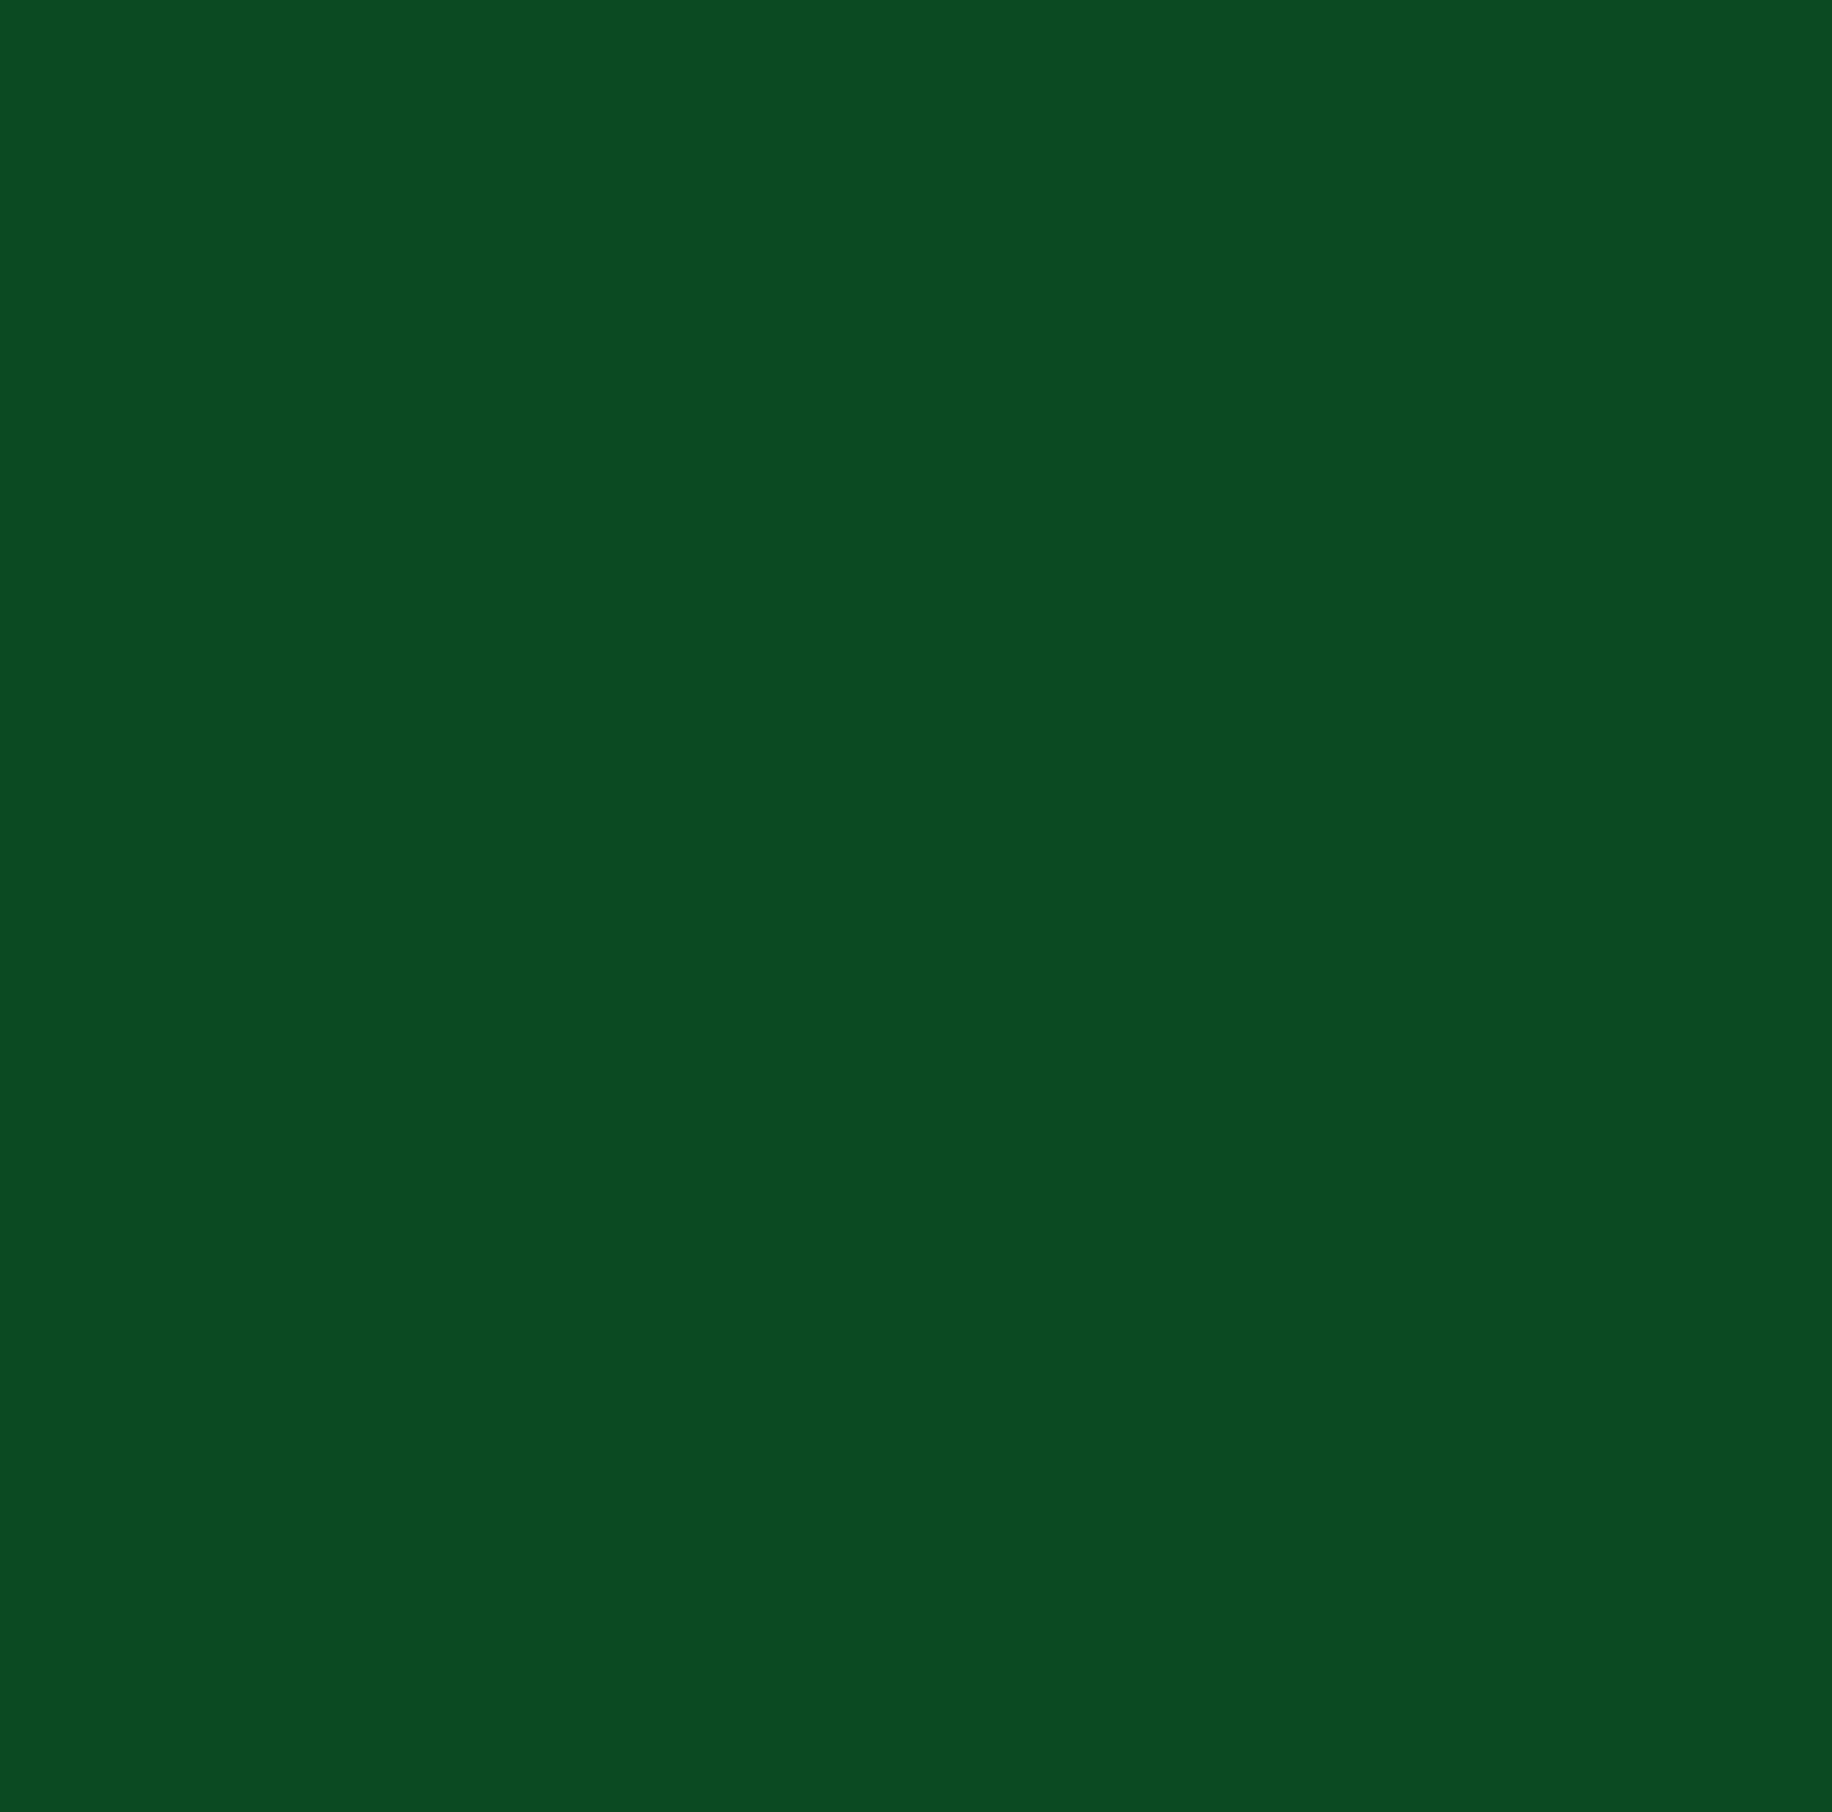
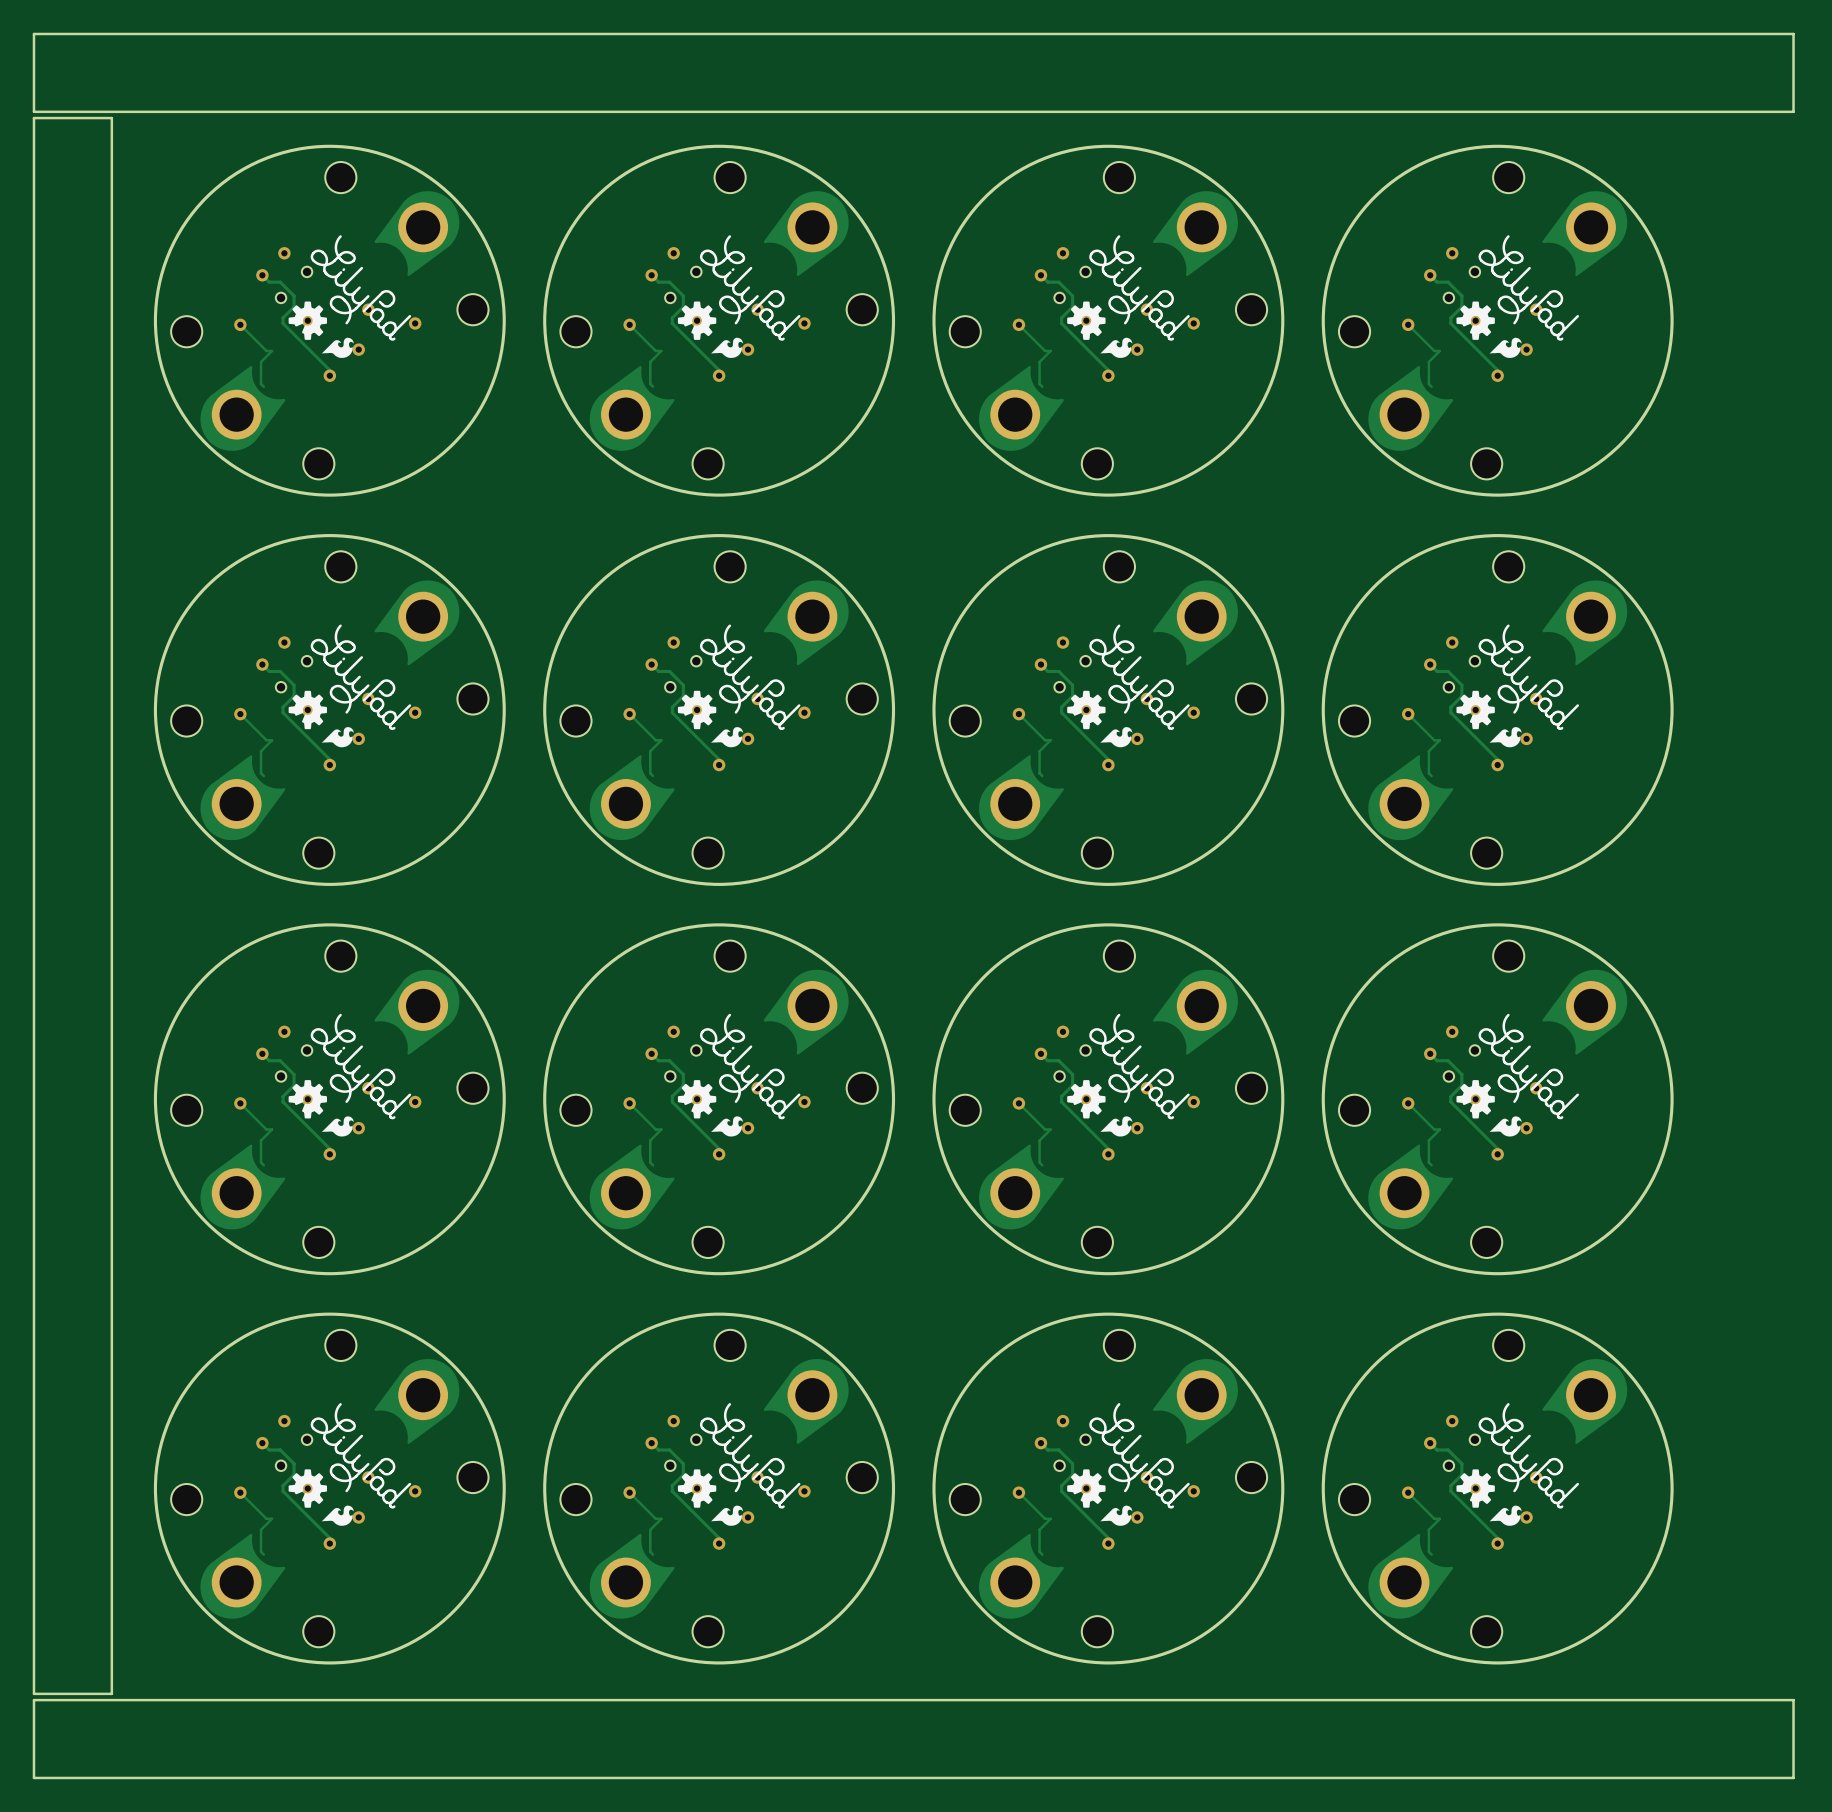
board edge: none -> (1793, 33) (1793, 111) (33, 111) (33, 33) (1793, 33)
board edge: none -> (111, 118) (33, 118) (33, 1693) (111, 1693) (111, 118)
round board edge: none -> [153, 144, 506, 497]
round board edge: none -> [543, 144, 896, 497]
round board edge: none -> [932, 144, 1285, 497]
round board edge: none -> [1321, 144, 1674, 497]
part: none -> (340, 177)
part: none -> (730, 177)
part: none -> (1119, 177)
part: none -> (1508, 177)
part: none -> (416, 233)
part: none -> (806, 233)
part: none -> (1195, 233)
part: none -> (1584, 233)
drawing: none -> [288, 235, 412, 358]
drawing: none -> [677, 235, 801, 358]
drawing: none -> [1067, 235, 1190, 358]
drawing: none -> [1456, 235, 1580, 358]
via: none -> (284, 253)
via: none -> (673, 253)
via: none -> (1062, 253)
via: none -> (1452, 253)
track: none -> (262, 275) (269, 282) (280, 282) (294, 295) (294, 306) (283, 317) (283, 323) (329, 370) (329, 375)
via: none -> (262, 275)
track: none -> (651, 275) (658, 282) (669, 282) (683, 295) (683, 306) (672, 317) (672, 323) (719, 370) (719, 375)
via: none -> (651, 275)
track: none -> (1040, 275) (1047, 282) (1058, 282) (1072, 295) (1072, 306) (1061, 317) (1061, 323) (1108, 370) (1108, 375)
via: none -> (1040, 275)
track: none -> (1430, 275) (1437, 282) (1448, 282) (1461, 295) (1461, 306) (1450, 317) (1450, 323) (1497, 370) (1497, 375)
via: none -> (1430, 275)
part: none -> (294, 284)
part: none -> (683, 284)
part: none -> (1072, 284)
part: none -> (1461, 284)
via: none -> (368, 309)
part: none -> (472, 309)
via: none -> (757, 309)
part: none -> (862, 309)
via: none -> (1146, 309)
part: none -> (1251, 309)
via: none -> (1536, 309)
via: none -> (307, 320)
via: none -> (697, 320)
via: none -> (1086, 320)
via: none -> (1475, 320)
via: none -> (415, 323)
via: none -> (804, 323)
via: none -> (1193, 323)
track: none -> (240, 324) (266, 350) (272, 350) (261, 362) (261, 384) (263, 386)
via: none -> (240, 324)
track: none -> (629, 324) (655, 350) (661, 350) (650, 362) (650, 384) (653, 386)
via: none -> (629, 324)
track: none -> (1018, 324) (1045, 350) (1050, 350) (1039, 362) (1039, 384) (1042, 386)
via: none -> (1018, 324)
track: none -> (1408, 324) (1434, 350) (1439, 350) (1428, 362) (1428, 384) (1431, 386)
via: none -> (1408, 324)
part: none -> (186, 331)
part: none -> (575, 331)
part: none -> (965, 331)
part: none -> (1354, 331)
via: none -> (358, 349)
via: none -> (748, 349)
via: none -> (1137, 349)
via: none -> (1526, 349)
via: none -> (329, 375)
via: none -> (719, 375)
via: none -> (1108, 375)
via: none -> (1497, 375)
part: none -> (242, 408)
part: none -> (632, 408)
part: none -> (1021, 408)
part: none -> (1410, 408)
part: none -> (318, 463)
part: none -> (708, 463)
part: none -> (1097, 463)
part: none -> (1486, 463)
round board edge: none -> [153, 534, 506, 886]
round board edge: none -> [543, 534, 896, 886]
round board edge: none -> [932, 534, 1285, 886]
round board edge: none -> [1321, 534, 1674, 886]
part: none -> (340, 566)
part: none -> (730, 566)
part: none -> (1119, 566)
part: none -> (1508, 566)
part: none -> (416, 622)
part: none -> (806, 622)
part: none -> (1195, 622)
part: none -> (1584, 622)
drawing: none -> [288, 624, 412, 748]
drawing: none -> [677, 624, 801, 748]
drawing: none -> [1067, 624, 1190, 748]
drawing: none -> [1456, 624, 1580, 748]
via: none -> (284, 642)
via: none -> (673, 642)
via: none -> (1062, 642)
via: none -> (1452, 642)
track: none -> (262, 664) (269, 671) (280, 671) (294, 685) (294, 696) (283, 707) (283, 712) (329, 759) (329, 765)
via: none -> (262, 664)
track: none -> (651, 664) (658, 671) (669, 671) (683, 685) (683, 696) (672, 707) (672, 712) (719, 759) (719, 765)
via: none -> (651, 664)
track: none -> (1040, 664) (1047, 671) (1058, 671) (1072, 685) (1072, 696) (1061, 707) (1061, 712) (1108, 759) (1108, 765)
via: none -> (1040, 664)
track: none -> (1430, 664) (1437, 671) (1448, 671) (1461, 685) (1461, 696) (1450, 707) (1450, 712) (1497, 759) (1497, 765)
via: none -> (1430, 664)
part: none -> (294, 674)
part: none -> (683, 674)
part: none -> (1072, 674)
part: none -> (1461, 674)
via: none -> (368, 698)
part: none -> (472, 698)
via: none -> (757, 698)
part: none -> (862, 698)
via: none -> (1146, 698)
part: none -> (1251, 698)
via: none -> (1536, 698)
via: none -> (307, 709)
via: none -> (697, 709)
via: none -> (1086, 709)
via: none -> (1475, 709)
via: none -> (415, 712)
via: none -> (804, 712)
via: none -> (1193, 712)
track: none -> (240, 714) (266, 740) (272, 740) (261, 751) (261, 773) (263, 776)
via: none -> (240, 714)
track: none -> (629, 714) (655, 740) (661, 740) (650, 751) (650, 773) (653, 776)
via: none -> (629, 714)
track: none -> (1018, 714) (1045, 740) (1050, 740) (1039, 751) (1039, 773) (1042, 776)
via: none -> (1018, 714)
track: none -> (1408, 714) (1434, 740) (1439, 740) (1428, 751) (1428, 773) (1431, 776)
via: none -> (1408, 714)
part: none -> (186, 721)
part: none -> (575, 721)
part: none -> (965, 721)
part: none -> (1354, 721)
via: none -> (358, 738)
via: none -> (748, 738)
via: none -> (1137, 738)
via: none -> (1526, 738)
via: none -> (329, 765)
via: none -> (719, 765)
via: none -> (1108, 765)
via: none -> (1497, 765)
part: none -> (242, 797)
part: none -> (632, 797)
part: none -> (1021, 797)
part: none -> (1410, 797)
part: none -> (318, 853)
part: none -> (708, 853)
part: none -> (1097, 853)
part: none -> (1486, 853)
round board edge: none -> [153, 923, 506, 1276]
round board edge: none -> [543, 923, 896, 1276]
round board edge: none -> [932, 923, 1285, 1276]
round board edge: none -> [1321, 923, 1674, 1276]
part: none -> (340, 956)
part: none -> (730, 956)
part: none -> (1119, 956)
part: none -> (1508, 956)
part: none -> (416, 1012)
part: none -> (806, 1012)
part: none -> (1195, 1012)
part: none -> (1584, 1012)
drawing: none -> [288, 1013, 412, 1137]
drawing: none -> [677, 1013, 801, 1137]
drawing: none -> [1067, 1013, 1190, 1137]
drawing: none -> [1456, 1013, 1580, 1137]
via: none -> (284, 1031)
via: none -> (673, 1031)
via: none -> (1062, 1031)
via: none -> (1452, 1031)
track: none -> (262, 1053) (269, 1060) (280, 1060) (294, 1074) (294, 1085) (283, 1096) (283, 1102) (329, 1148) (329, 1154)
via: none -> (262, 1053)
track: none -> (651, 1053) (658, 1060) (669, 1060) (683, 1074) (683, 1085) (672, 1096) (672, 1102) (719, 1148) (719, 1154)
via: none -> (651, 1053)
track: none -> (1040, 1053) (1047, 1060) (1058, 1060) (1072, 1074) (1072, 1085) (1061, 1096) (1061, 1102) (1108, 1148) (1108, 1154)
via: none -> (1040, 1053)
track: none -> (1430, 1053) (1437, 1060) (1448, 1060) (1461, 1074) (1461, 1085) (1450, 1096) (1450, 1102) (1497, 1148) (1497, 1154)
via: none -> (1430, 1053)
part: none -> (294, 1063)
part: none -> (683, 1063)
part: none -> (1072, 1063)
part: none -> (1461, 1063)
via: none -> (368, 1088)
part: none -> (472, 1088)
via: none -> (757, 1088)
part: none -> (862, 1088)
via: none -> (1146, 1088)
part: none -> (1251, 1088)
via: none -> (1536, 1088)
via: none -> (307, 1099)
via: none -> (697, 1099)
via: none -> (1086, 1099)
via: none -> (1475, 1099)
via: none -> (415, 1102)
via: none -> (804, 1102)
via: none -> (1193, 1102)
track: none -> (240, 1103) (266, 1129) (272, 1129) (261, 1140) (261, 1162) (263, 1165)
via: none -> (240, 1103)
track: none -> (629, 1103) (655, 1129) (661, 1129) (650, 1140) (650, 1162) (653, 1165)
via: none -> (629, 1103)
track: none -> (1018, 1103) (1045, 1129) (1050, 1129) (1039, 1140) (1039, 1162) (1042, 1165)
via: none -> (1018, 1103)
track: none -> (1408, 1103) (1434, 1129) (1439, 1129) (1428, 1140) (1428, 1162) (1431, 1165)
via: none -> (1408, 1103)
part: none -> (186, 1110)
part: none -> (575, 1110)
part: none -> (965, 1110)
part: none -> (1354, 1110)
via: none -> (358, 1128)
via: none -> (748, 1128)
via: none -> (1137, 1128)
via: none -> (1526, 1128)
via: none -> (329, 1154)
via: none -> (719, 1154)
via: none -> (1108, 1154)
via: none -> (1497, 1154)
part: none -> (242, 1186)
part: none -> (632, 1186)
part: none -> (1021, 1186)
part: none -> (1410, 1186)
part: none -> (318, 1242)
part: none -> (708, 1242)
part: none -> (1097, 1242)
part: none -> (1486, 1242)
round board edge: none -> [153, 1312, 506, 1665]
round board edge: none -> [543, 1312, 896, 1665]
round board edge: none -> [932, 1312, 1285, 1665]
round board edge: none -> [1321, 1312, 1674, 1665]
part: none -> (340, 1345)
part: none -> (730, 1345)
part: none -> (1119, 1345)
part: none -> (1508, 1345)
part: none -> (416, 1401)
part: none -> (806, 1401)
part: none -> (1195, 1401)
part: none -> (1584, 1401)
drawing: none -> [288, 1403, 412, 1526]
drawing: none -> [677, 1403, 801, 1526]
drawing: none -> [1067, 1403, 1190, 1526]
drawing: none -> [1456, 1403, 1580, 1526]
via: none -> (284, 1421)
via: none -> (673, 1421)
via: none -> (1062, 1421)
via: none -> (1452, 1421)
track: none -> (262, 1443) (269, 1450) (280, 1450) (294, 1463) (294, 1474) (283, 1485) (283, 1491) (329, 1538) (329, 1543)
via: none -> (262, 1443)
track: none -> (651, 1443) (658, 1450) (669, 1450) (683, 1463) (683, 1474) (672, 1485) (672, 1491) (719, 1538) (719, 1543)
via: none -> (651, 1443)
track: none -> (1040, 1443) (1047, 1450) (1058, 1450) (1072, 1463) (1072, 1474) (1061, 1485) (1061, 1491) (1108, 1538) (1108, 1543)
via: none -> (1040, 1443)
track: none -> (1430, 1443) (1437, 1450) (1448, 1450) (1461, 1463) (1461, 1474) (1450, 1485) (1450, 1491) (1497, 1538) (1497, 1543)
via: none -> (1430, 1443)
part: none -> (294, 1452)
part: none -> (683, 1452)
part: none -> (1072, 1452)
part: none -> (1461, 1452)
via: none -> (368, 1477)
part: none -> (472, 1477)
via: none -> (757, 1477)
part: none -> (862, 1477)
via: none -> (1146, 1477)
part: none -> (1251, 1477)
via: none -> (1536, 1477)
via: none -> (307, 1488)
via: none -> (697, 1488)
via: none -> (1086, 1488)
via: none -> (1475, 1488)
via: none -> (415, 1491)
via: none -> (804, 1491)
via: none -> (1193, 1491)
track: none -> (240, 1492) (266, 1518) (272, 1518) (261, 1529) (261, 1551) (263, 1554)
via: none -> (240, 1492)
track: none -> (629, 1492) (655, 1518) (661, 1518) (650, 1529) (650, 1551) (653, 1554)
via: none -> (629, 1492)
track: none -> (1018, 1492) (1045, 1518) (1050, 1518) (1039, 1529) (1039, 1551) (1042, 1554)
via: none -> (1018, 1492)
track: none -> (1408, 1492) (1434, 1518) (1439, 1518) (1428, 1529) (1428, 1551) (1431, 1554)
via: none -> (1408, 1492)
part: none -> (186, 1499)
part: none -> (575, 1499)
part: none -> (965, 1499)
part: none -> (1354, 1499)
via: none -> (358, 1517)
via: none -> (748, 1517)
via: none -> (1137, 1517)
via: none -> (1526, 1517)
via: none -> (329, 1543)
via: none -> (719, 1543)
via: none -> (1108, 1543)
via: none -> (1497, 1543)
part: none -> (242, 1576)
part: none -> (632, 1576)
part: none -> (1021, 1576)
part: none -> (1410, 1576)
part: none -> (318, 1631)
part: none -> (708, 1631)
part: none -> (1097, 1631)
part: none -> (1486, 1631)
board edge: none -> (1793, 1700) (1793, 1777) (33, 1777) (33, 1700) (1793, 1700)

